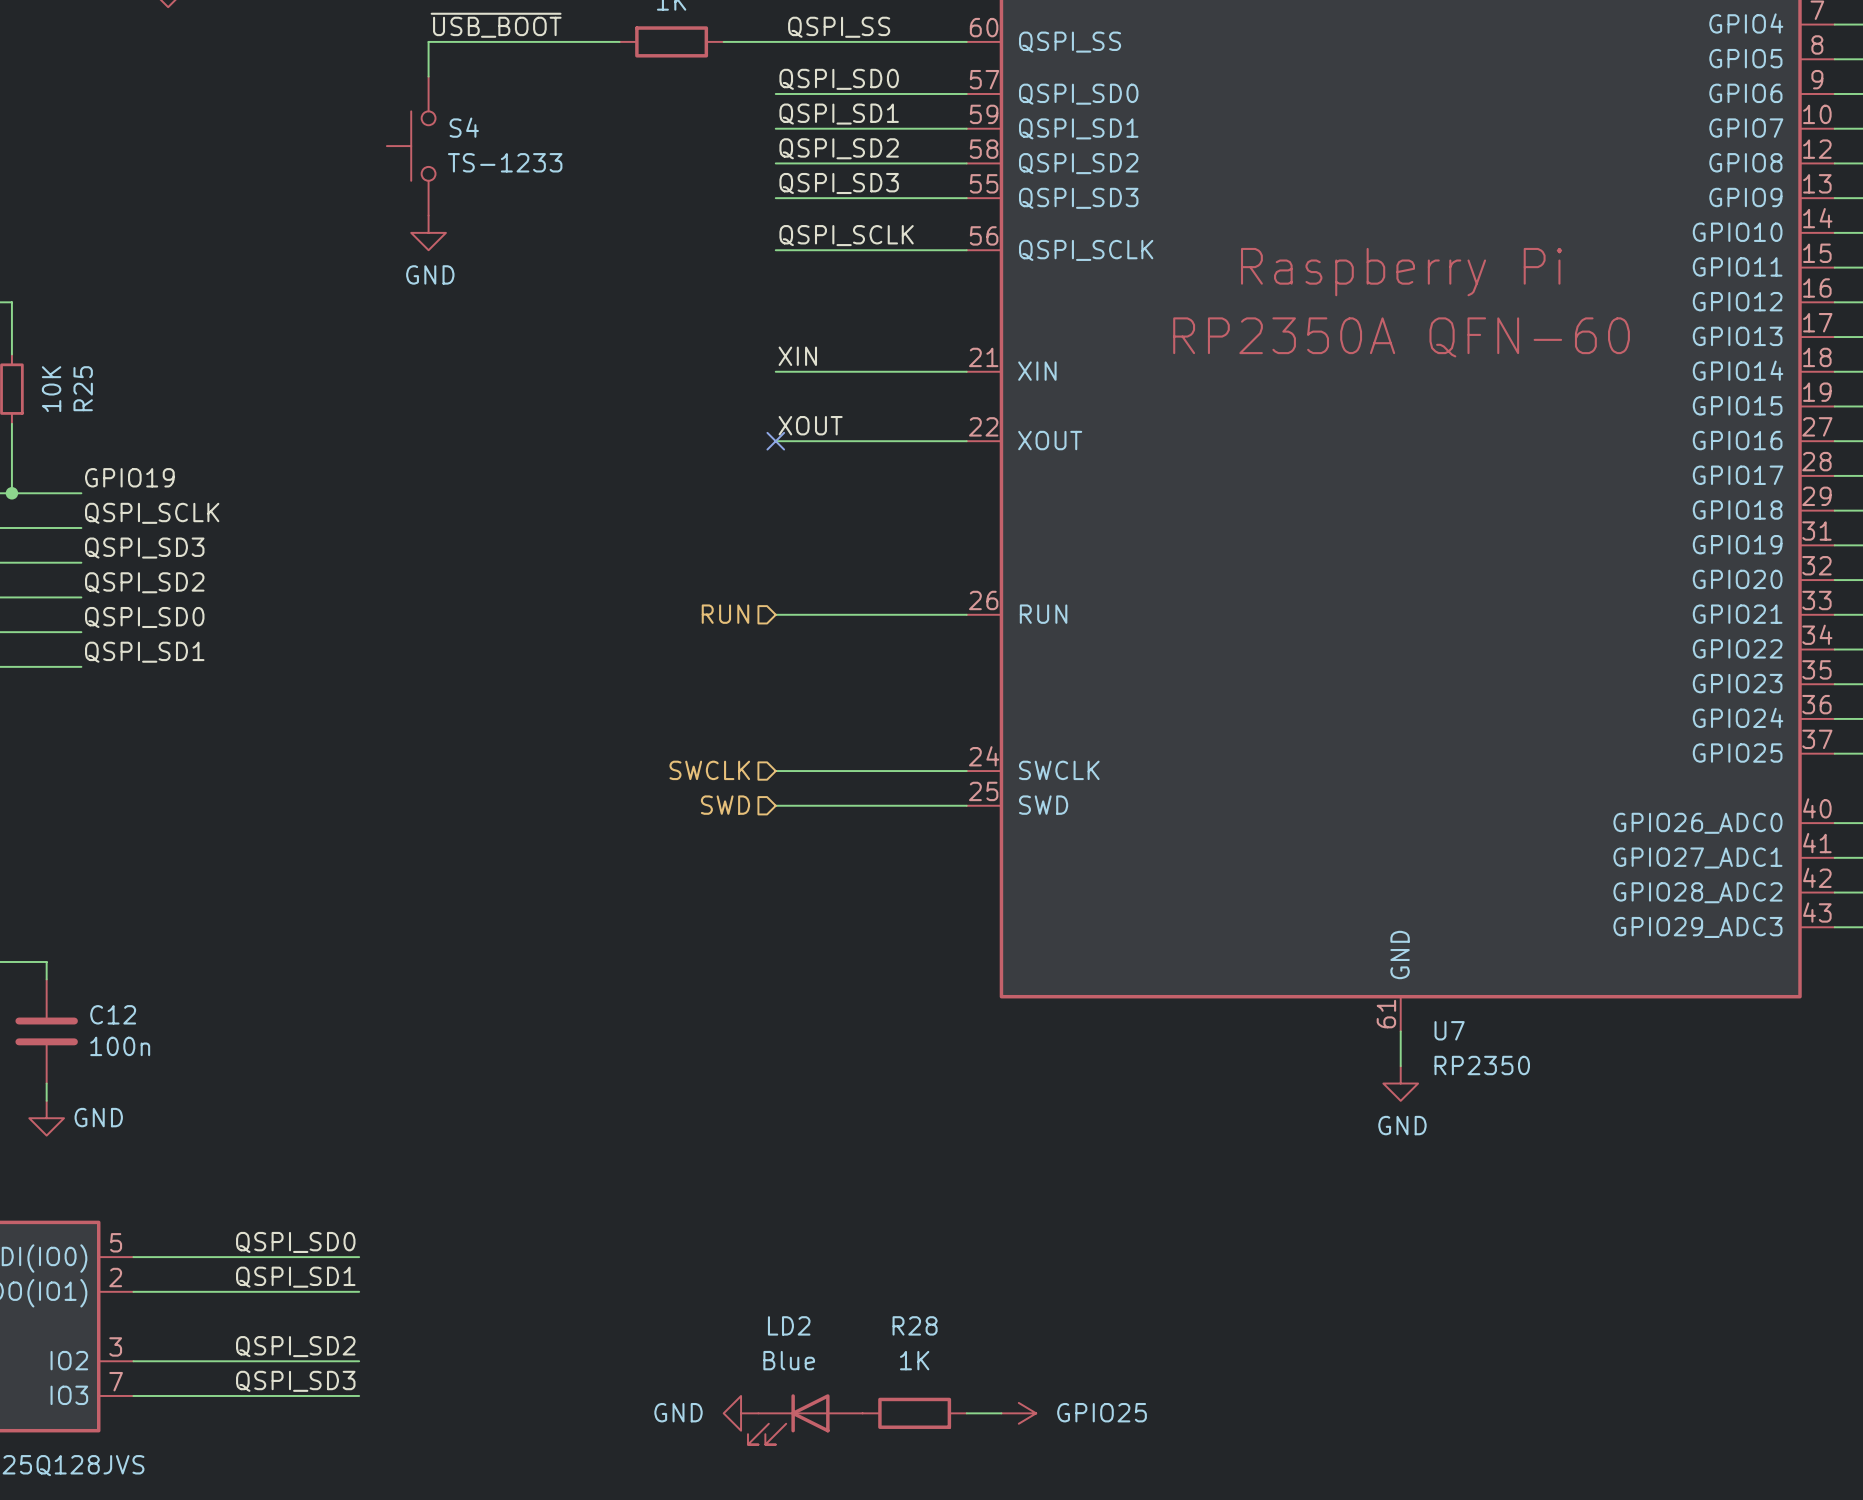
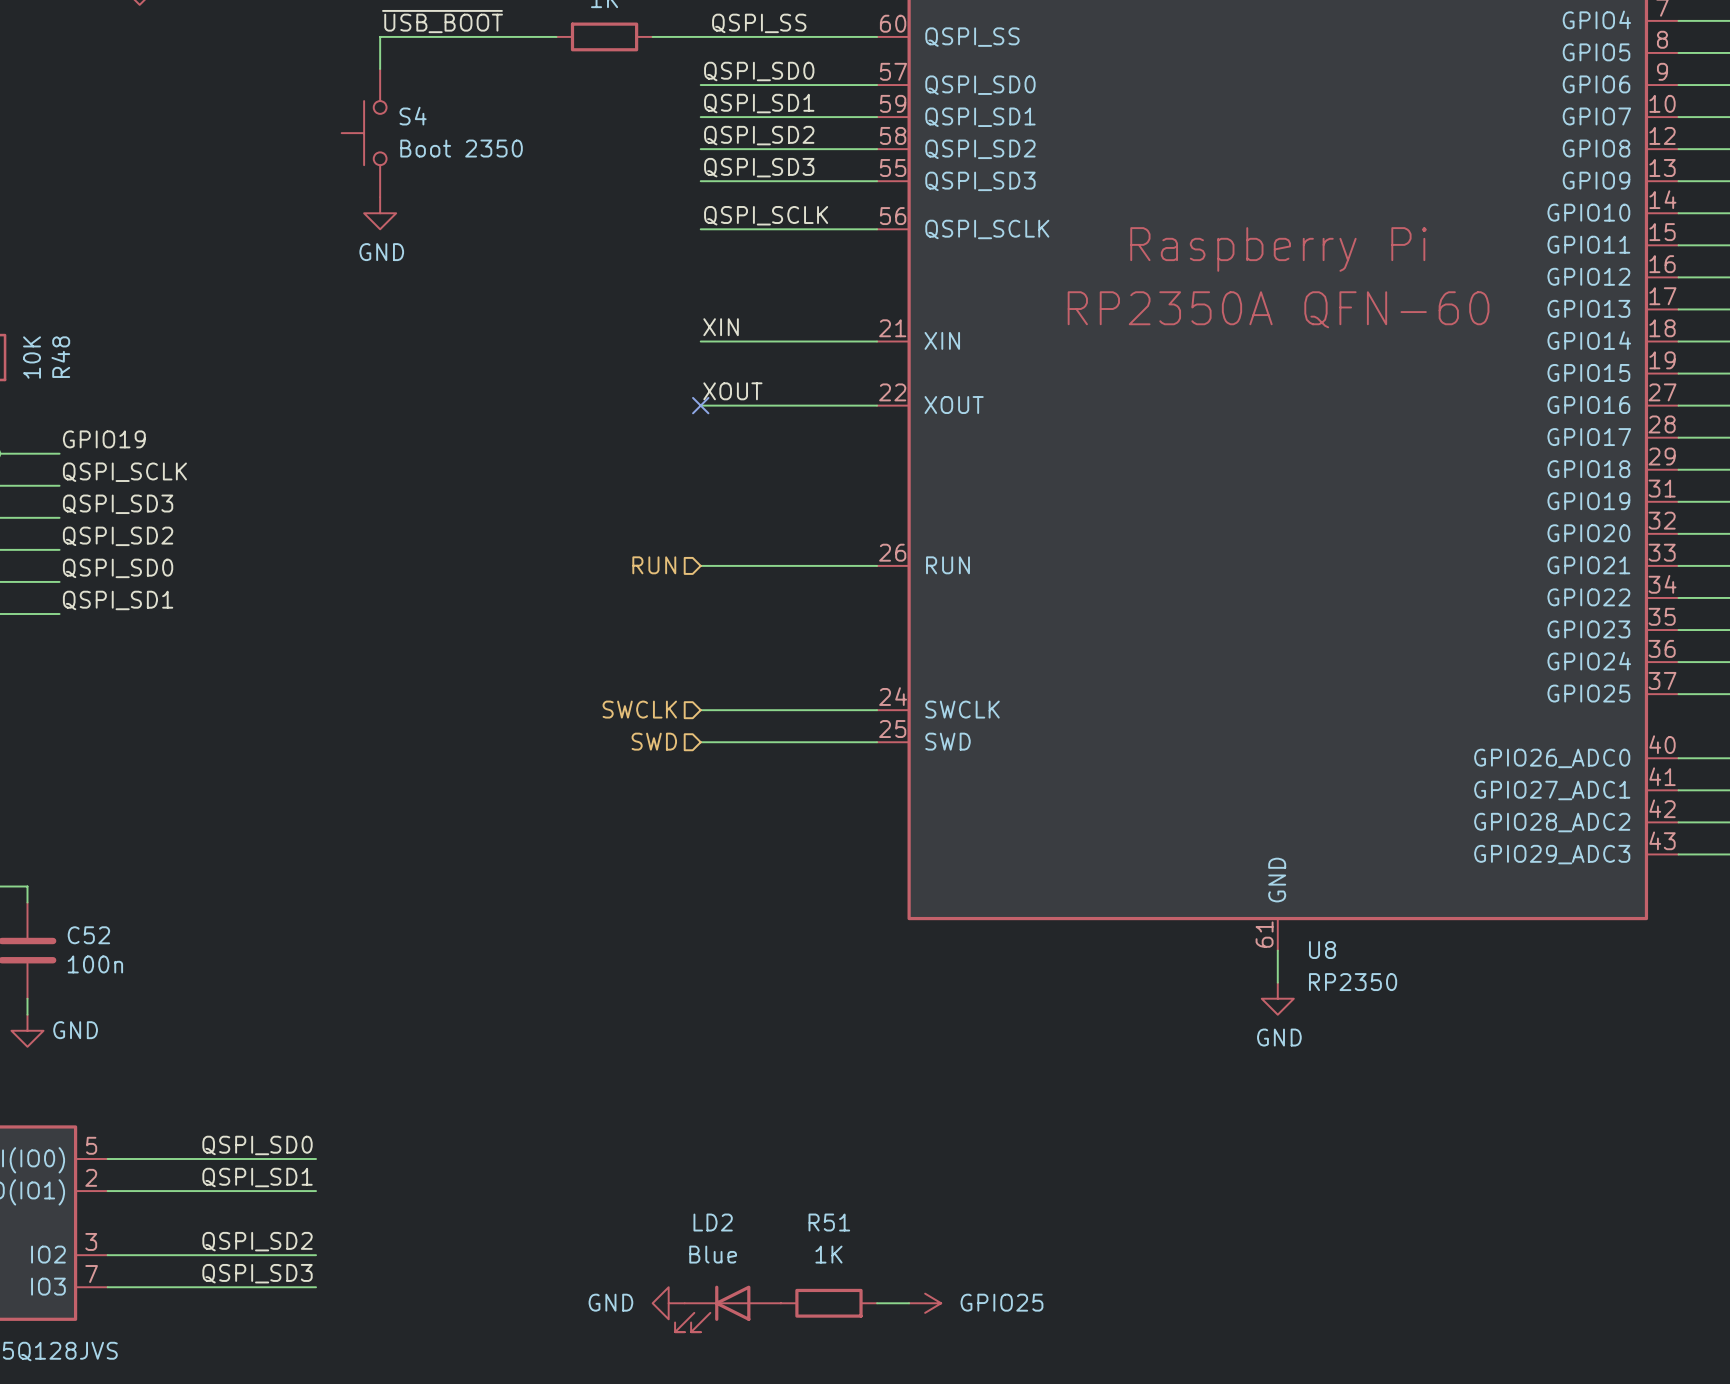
S4 value: TS-1233 (505, 162) -> Boot 2350 (461, 148)
R25 name: R25 (83, 388) -> R48 (60, 357)
C12 name: C12 (113, 1014) -> C52 (88, 935)
U7 name: U7 (1449, 1030) -> U8 (1322, 950)
R28 name: R28 (915, 1325) -> R51 (829, 1222)

